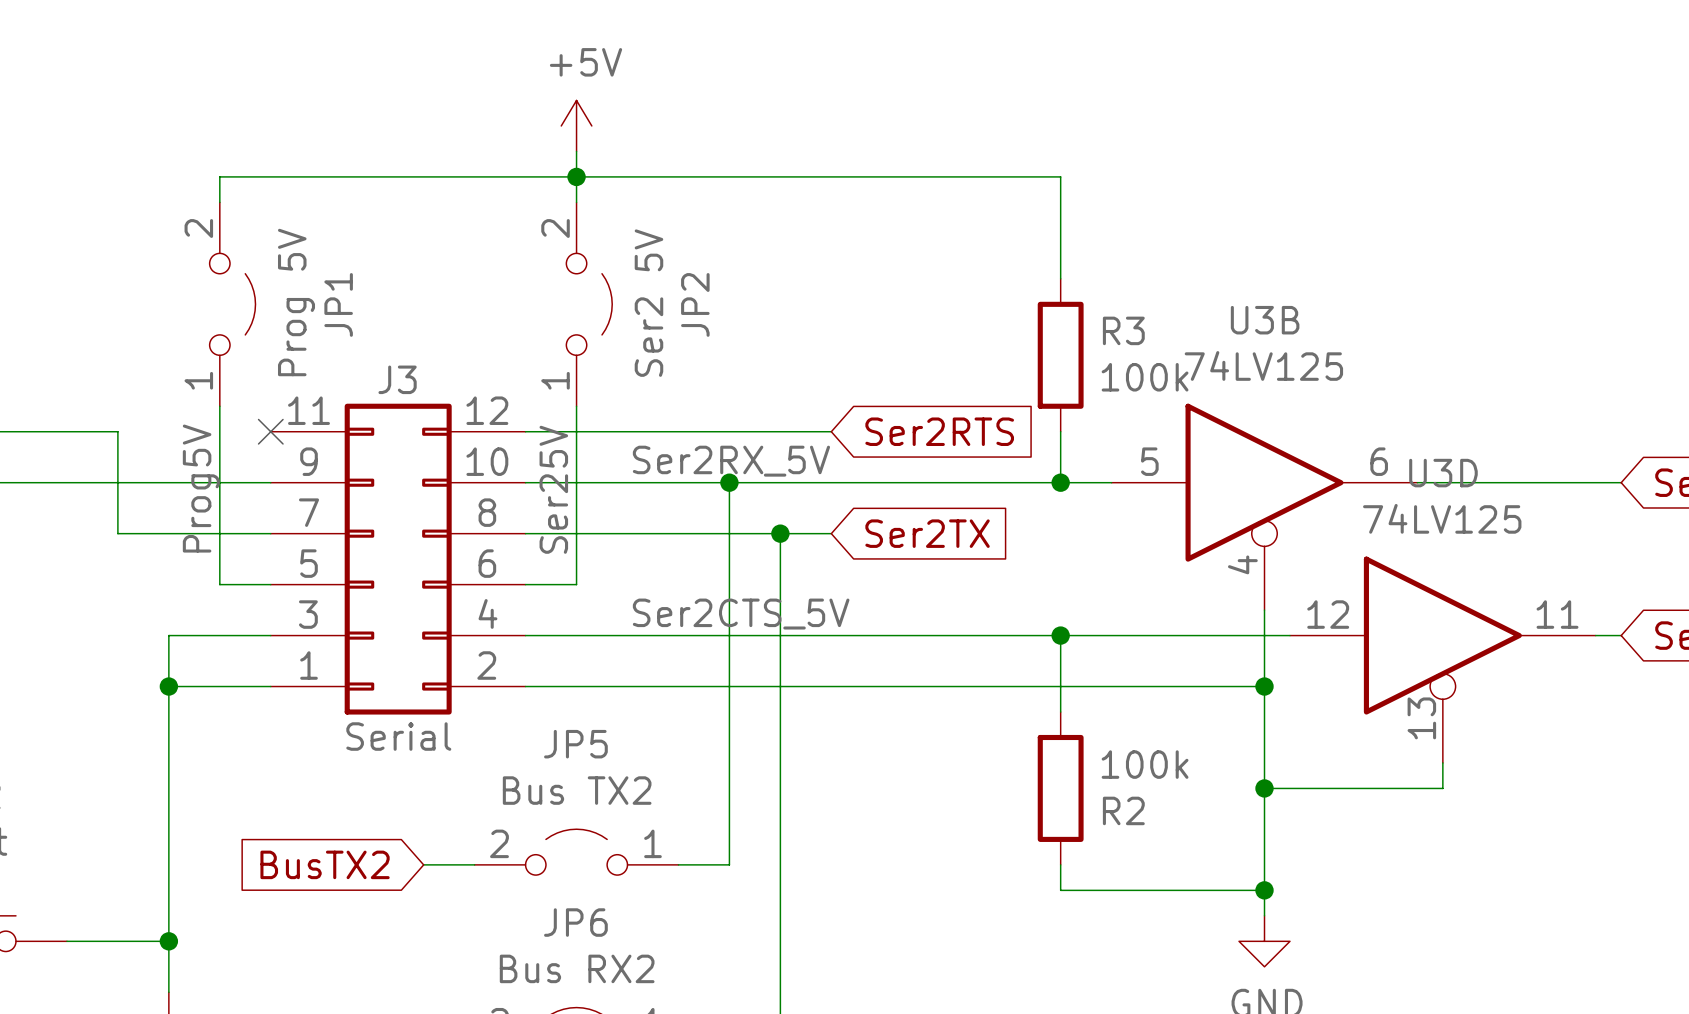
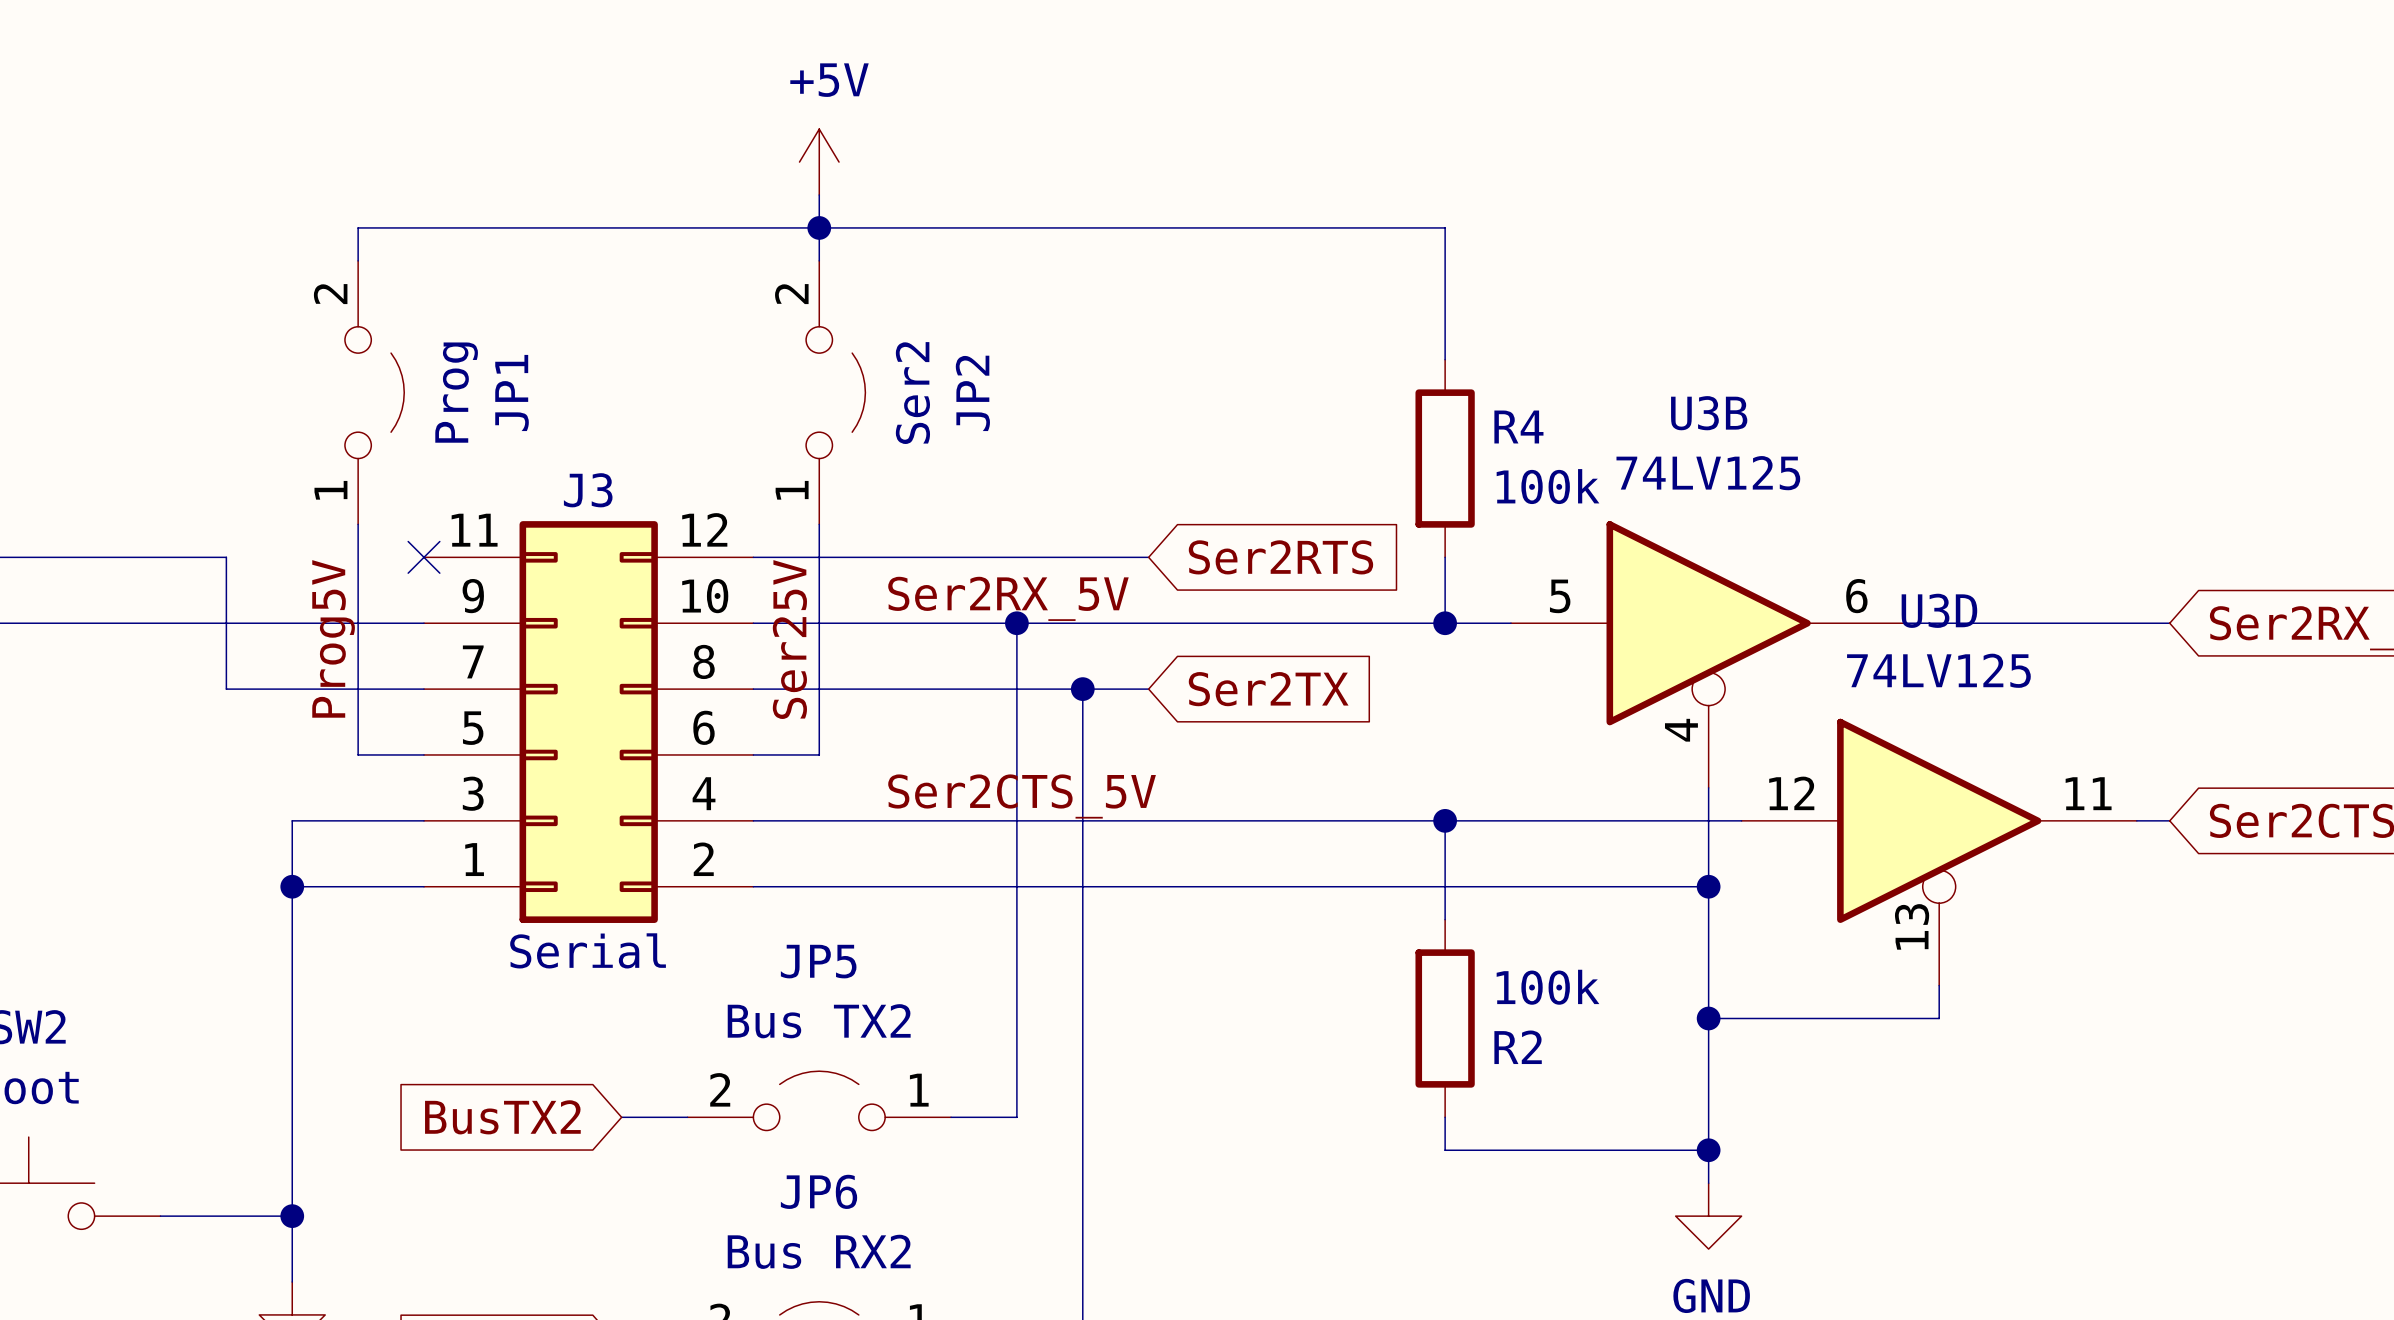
JP1 value: Prog 5V (296, 302) -> Prog (456, 392)
JP2 value: Ser2 5V (648, 303) -> Ser2 (912, 393)
R3 name: R3 (1123, 330) -> R4 (1518, 427)

